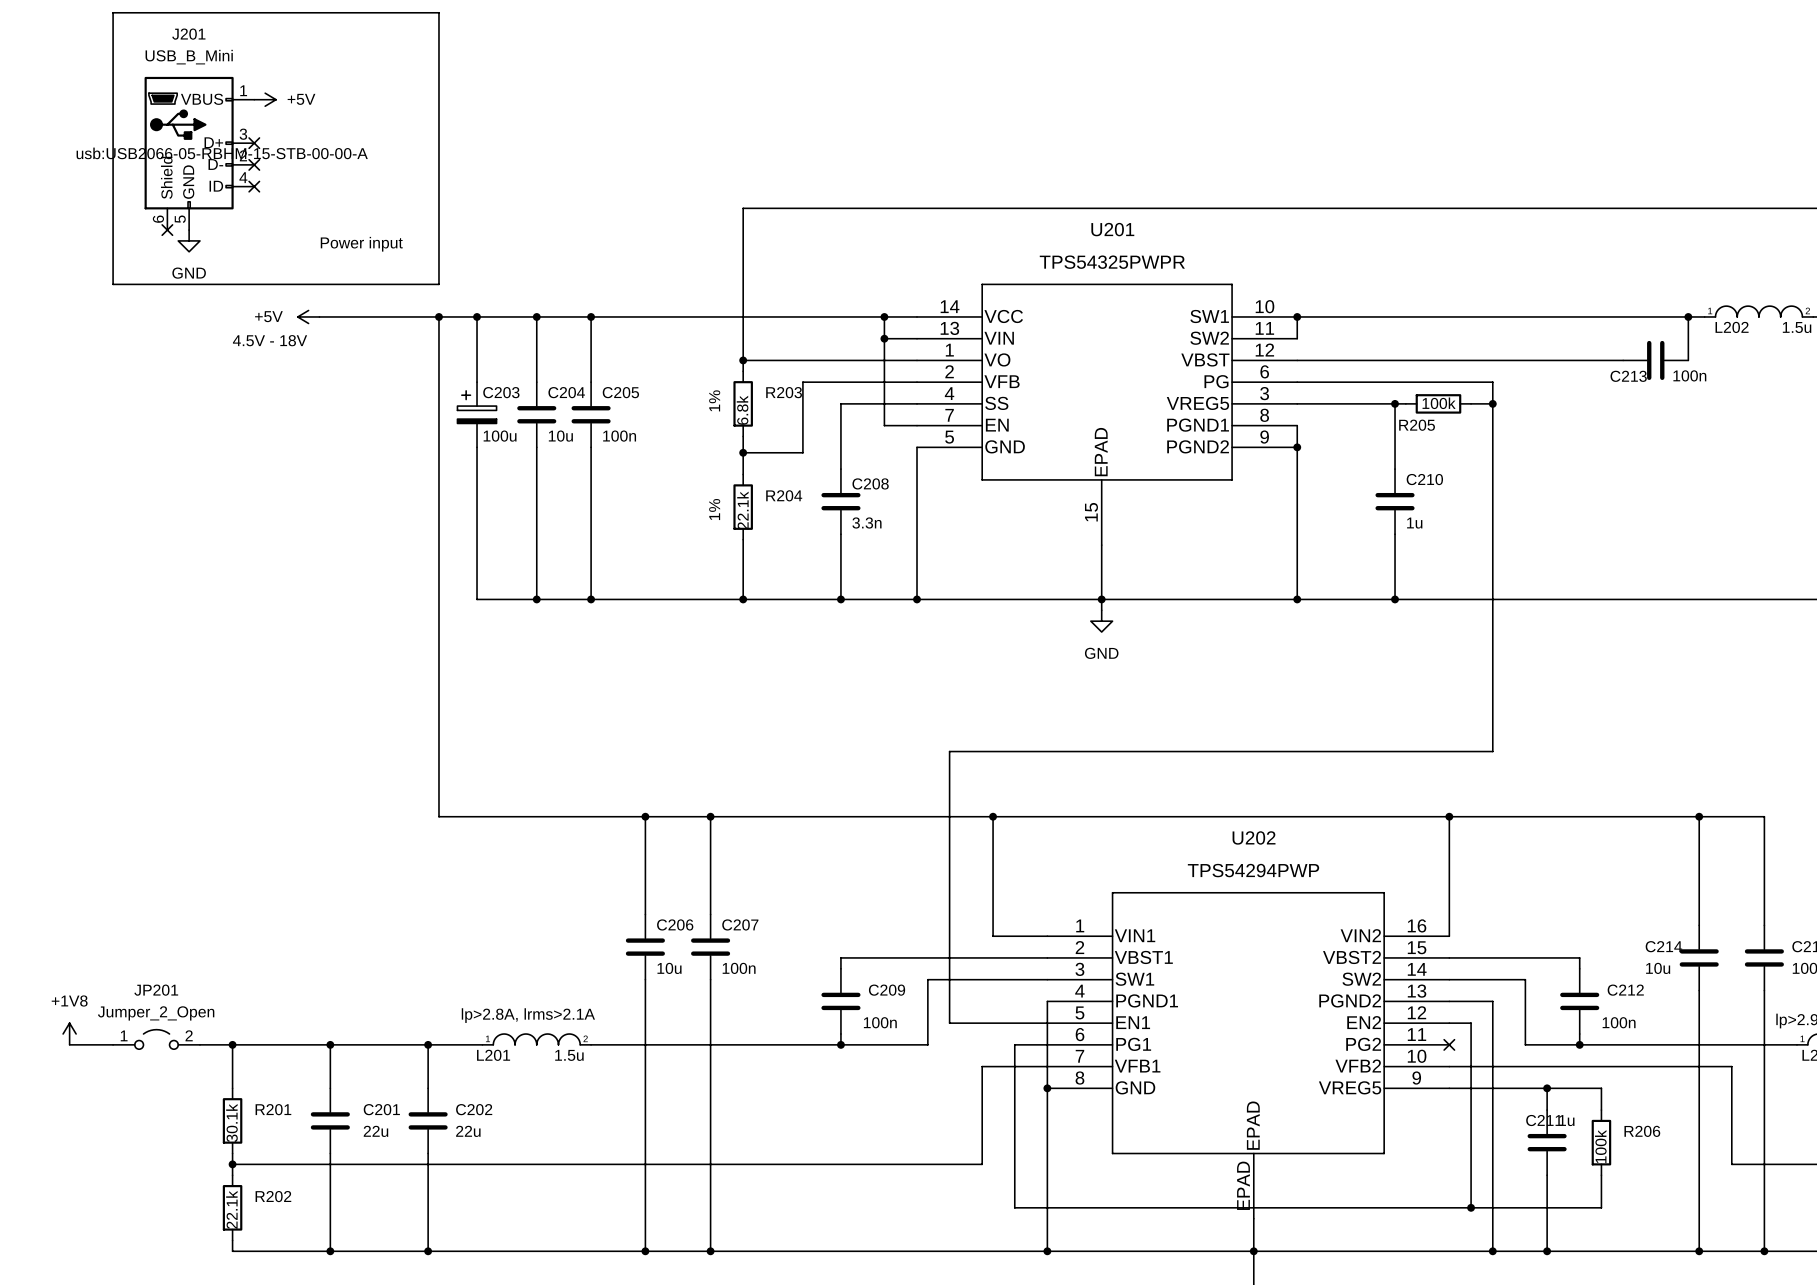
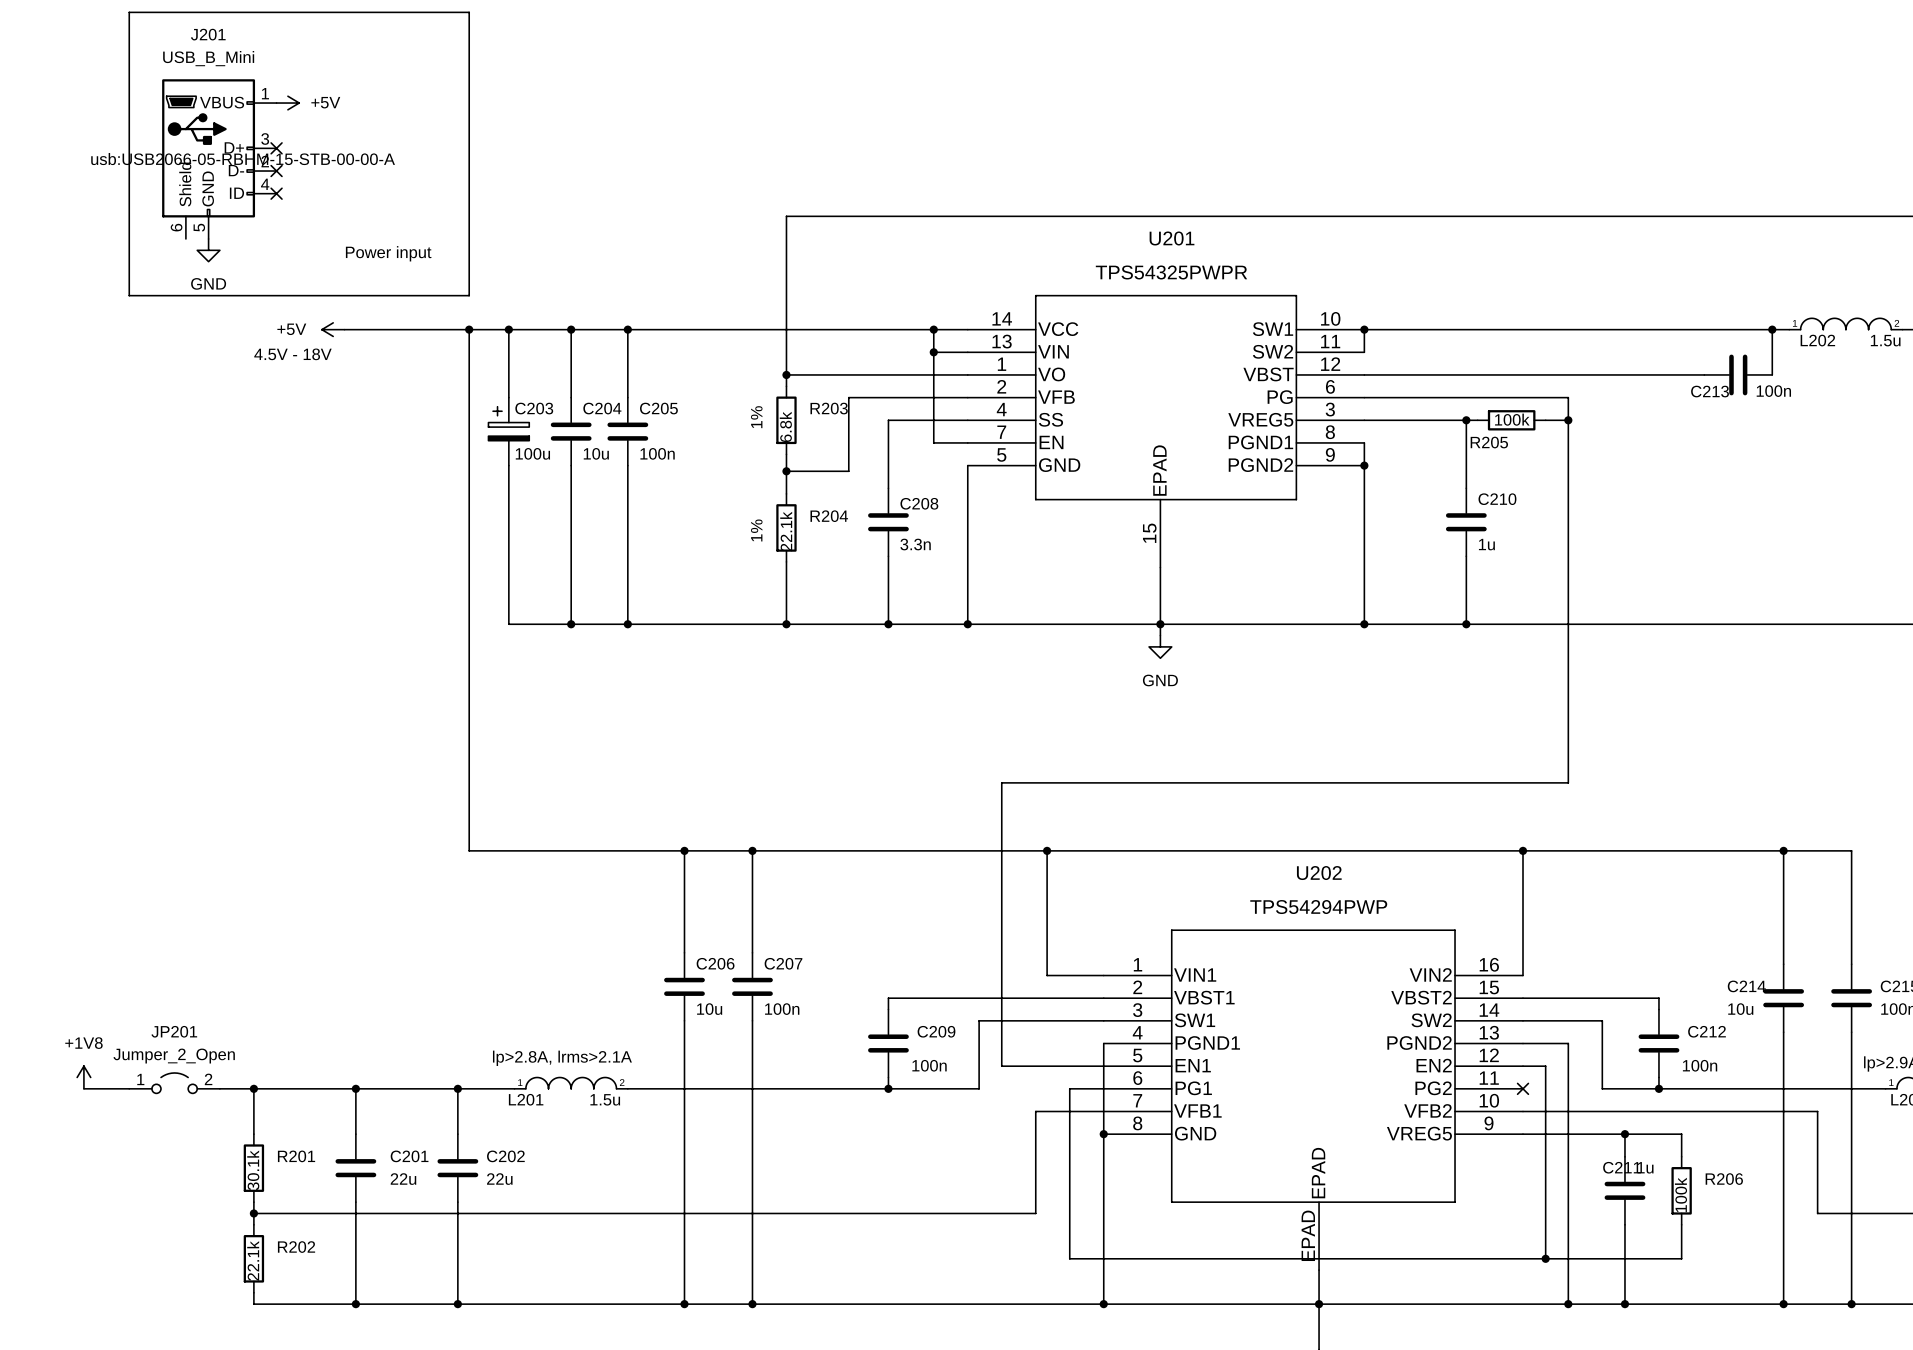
no-connect mark: (167, 230) -> none

